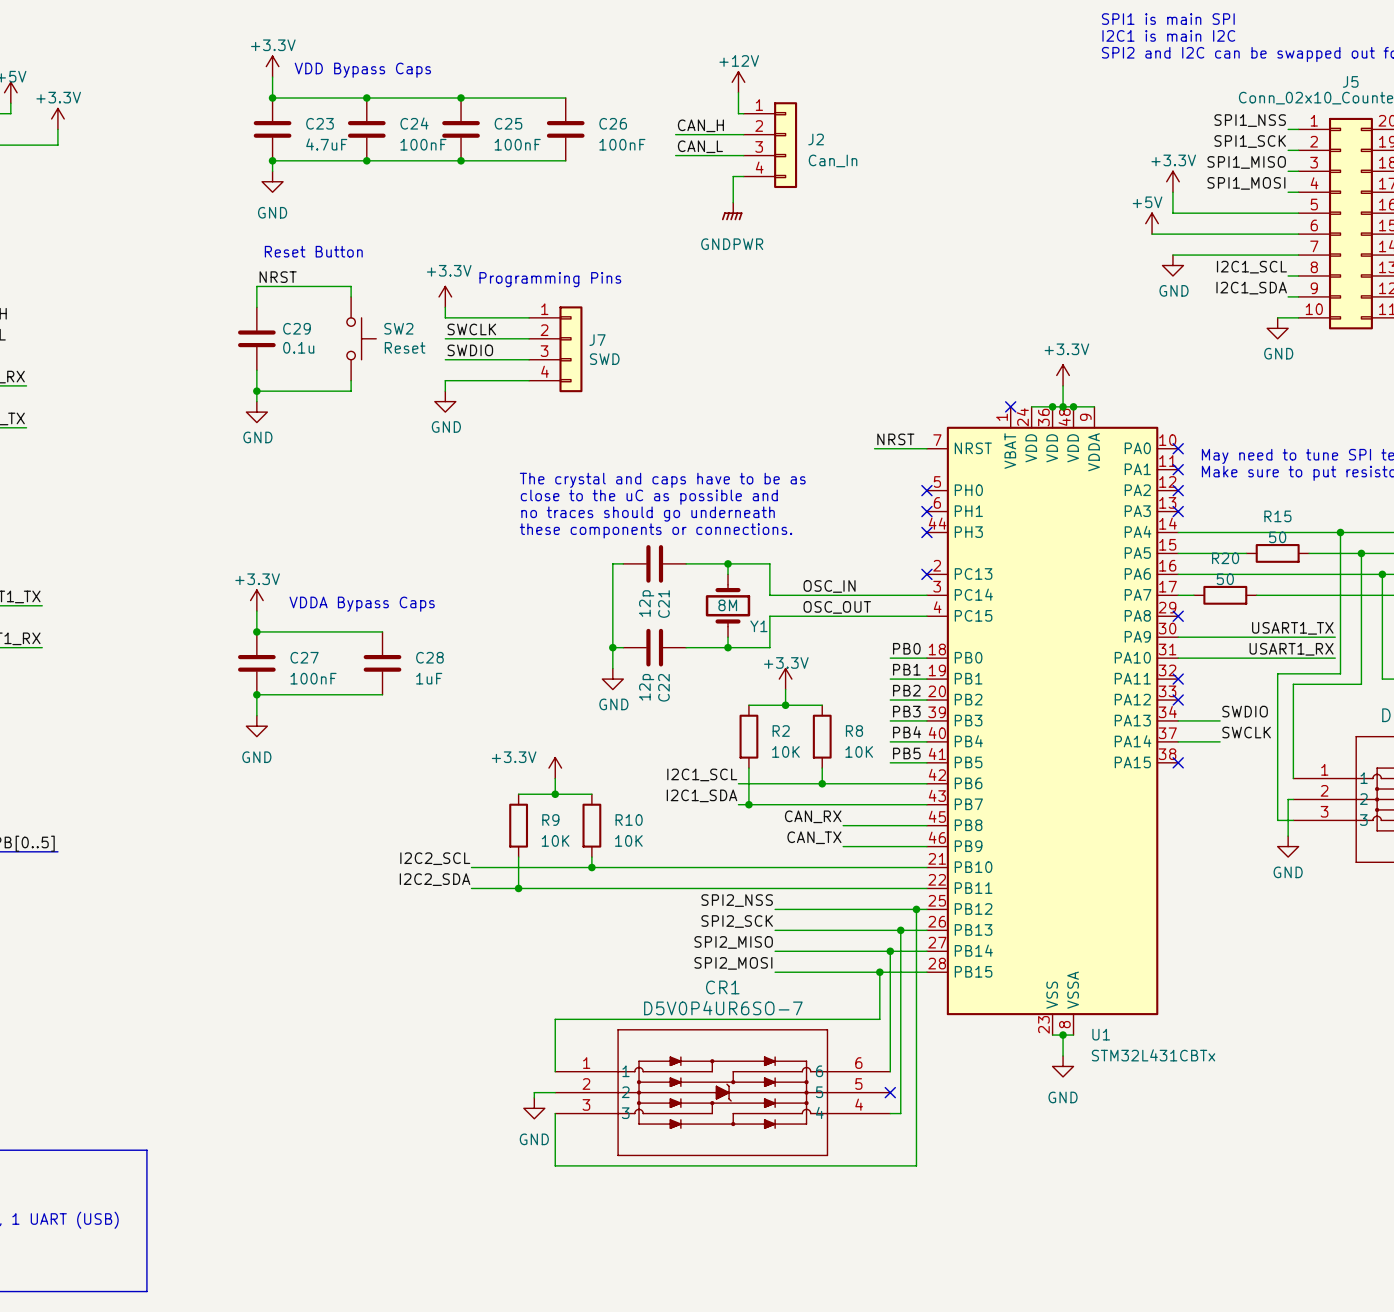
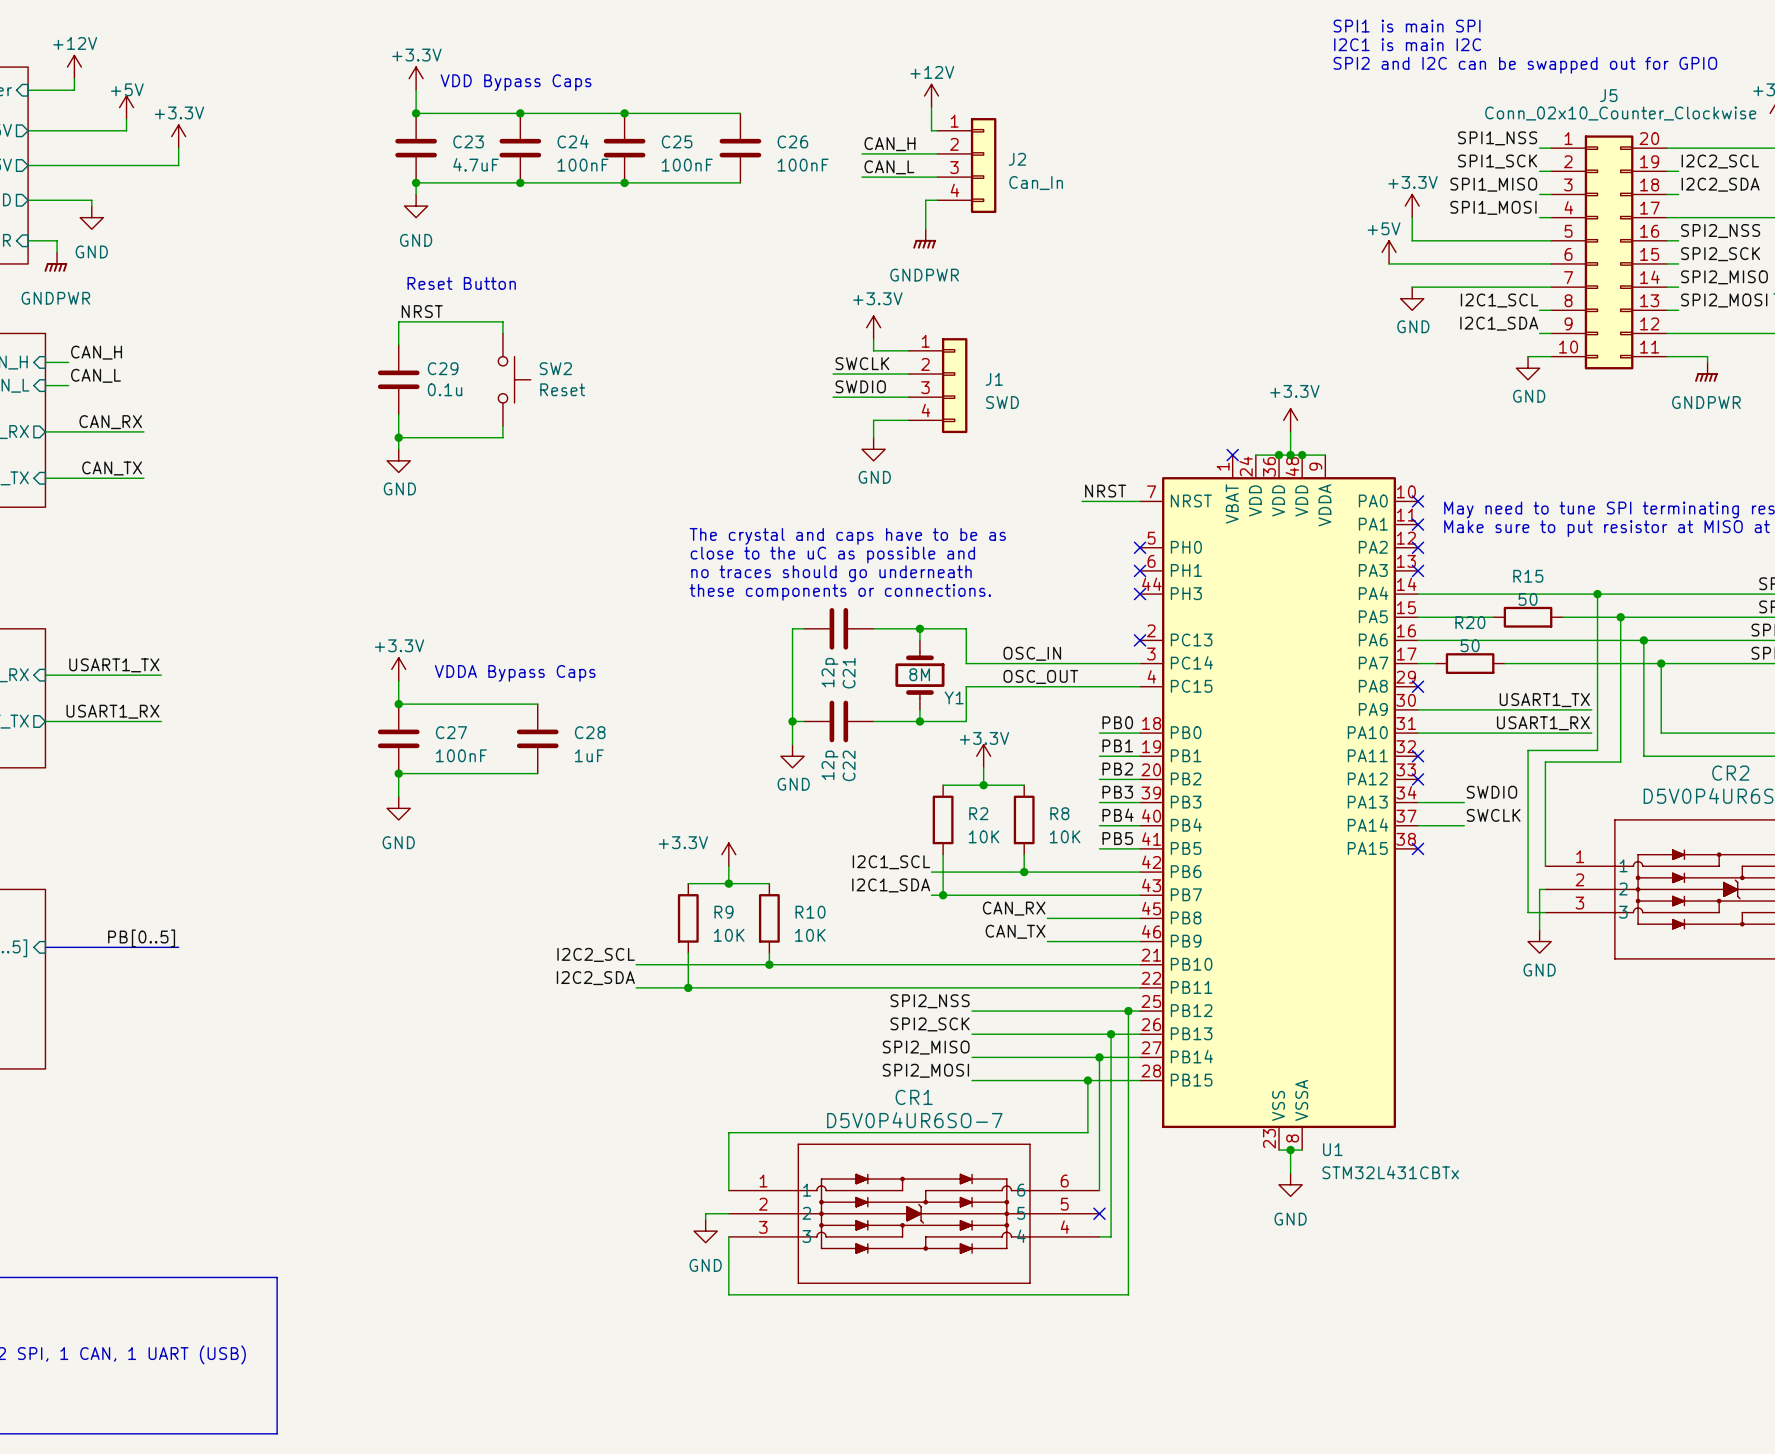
text: Programming Pins (550, 279) -> none
power symbol: none -> +3.3V (873, 327)
power symbol: +3.3V (445, 296) -> none
wire: none -> (873, 339) (873, 350) (908, 350)
wire: (445, 307) (445, 317) (529, 317) -> none
label position: SWCLK (471, 329) -> SWCLK (862, 363)
wire: none -> (833, 374) (908, 374)
wire: (445, 338) (529, 338) -> none
J1: none -> SWD (937, 385)
J7: SWD (555, 349) -> none
label position: SWDIO (470, 350) -> SWDIO (860, 386)
wire: none -> (833, 397) (908, 397)
wire: (445, 359) (529, 359) -> none
wire: none -> (908, 420) (873, 420) (873, 437)
wire: (529, 380) (445, 380) (445, 391) -> none
power symbol: GND (445, 401) -> none
power symbol: none -> GND (873, 449)

